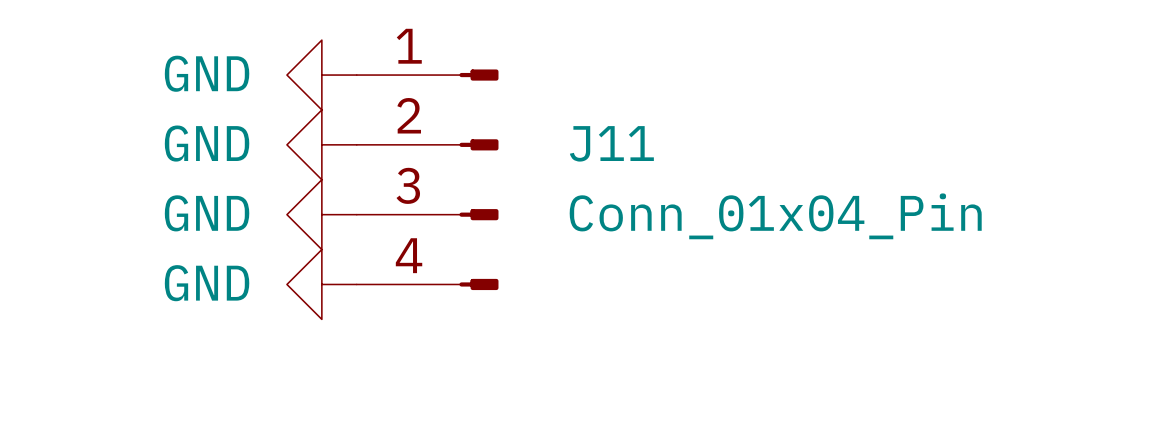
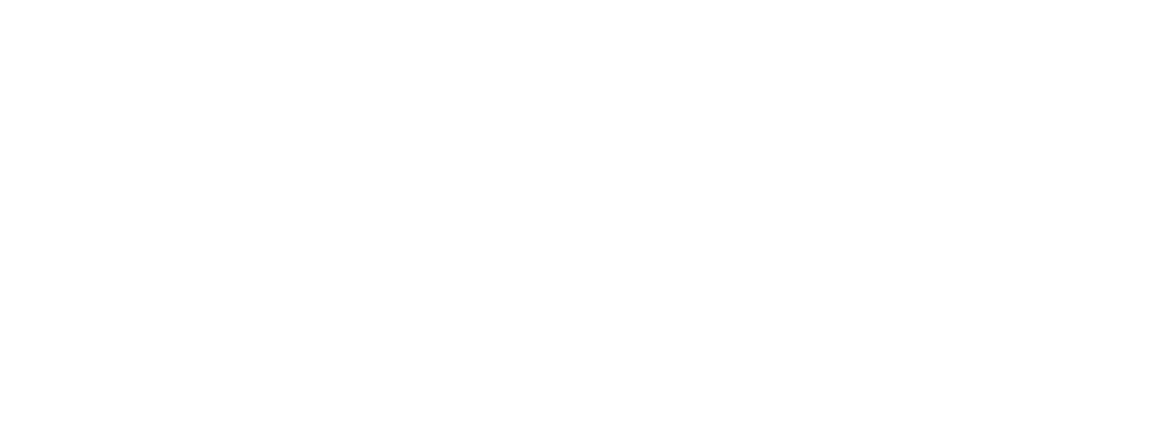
power symbol: GND (321, 75) -> none
power symbol: GND (321, 144) -> none
J11: Conn_01x04_Pin (427, 179) -> none
power symbol: GND (321, 214) -> none
power symbol: GND (321, 284) -> none

